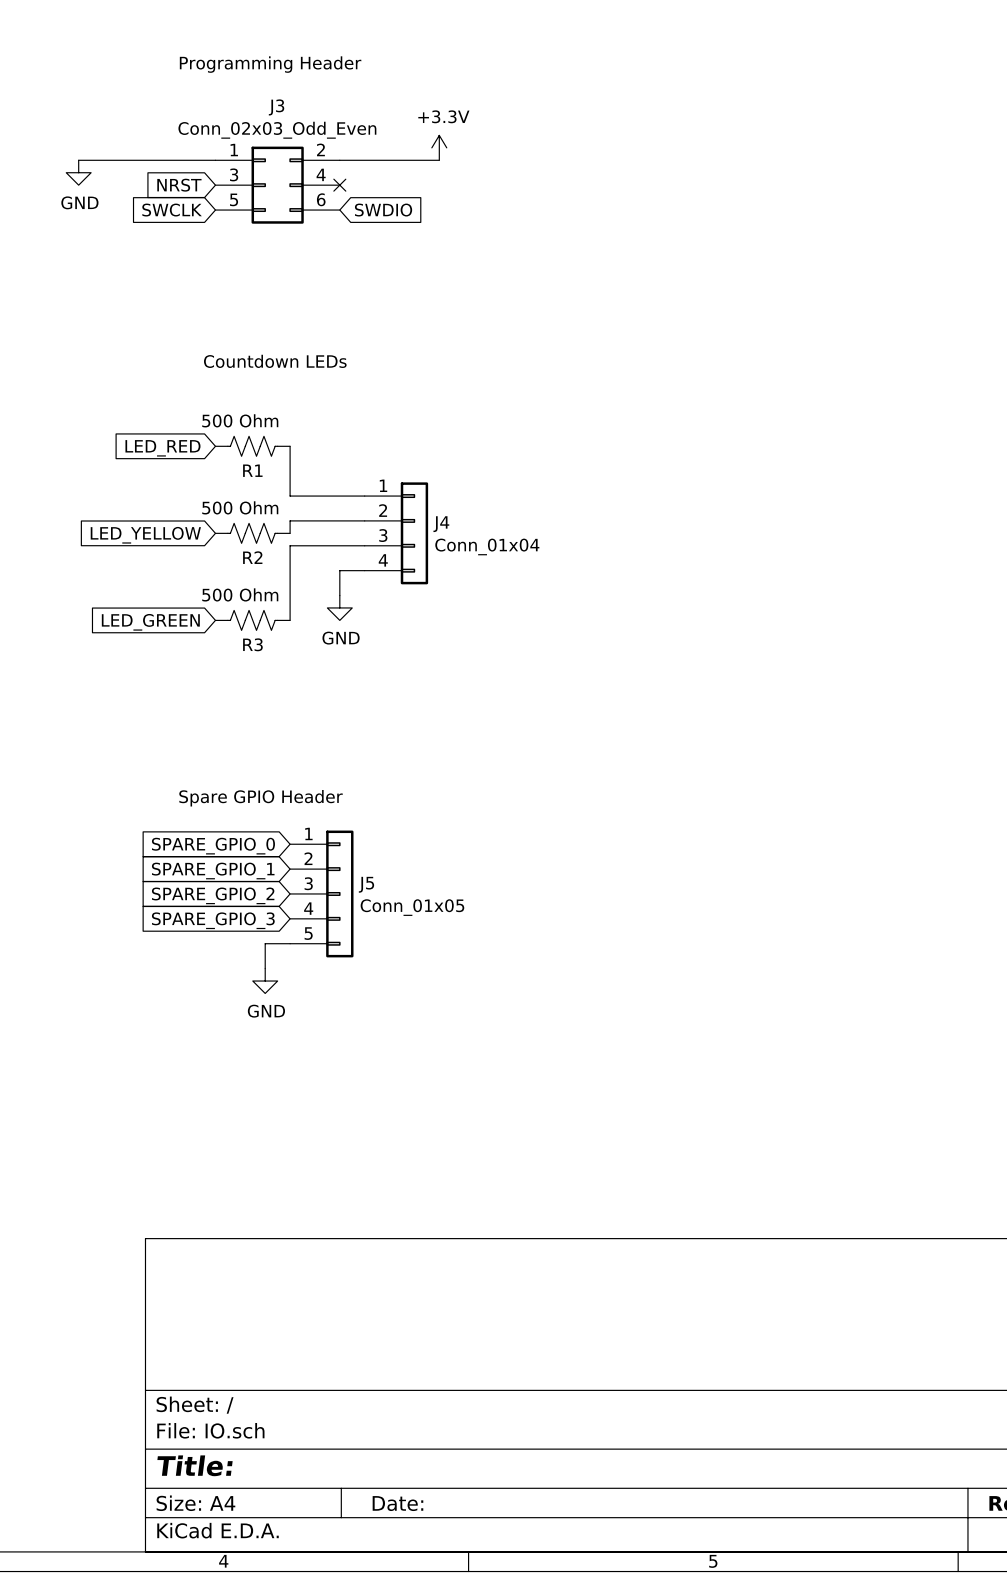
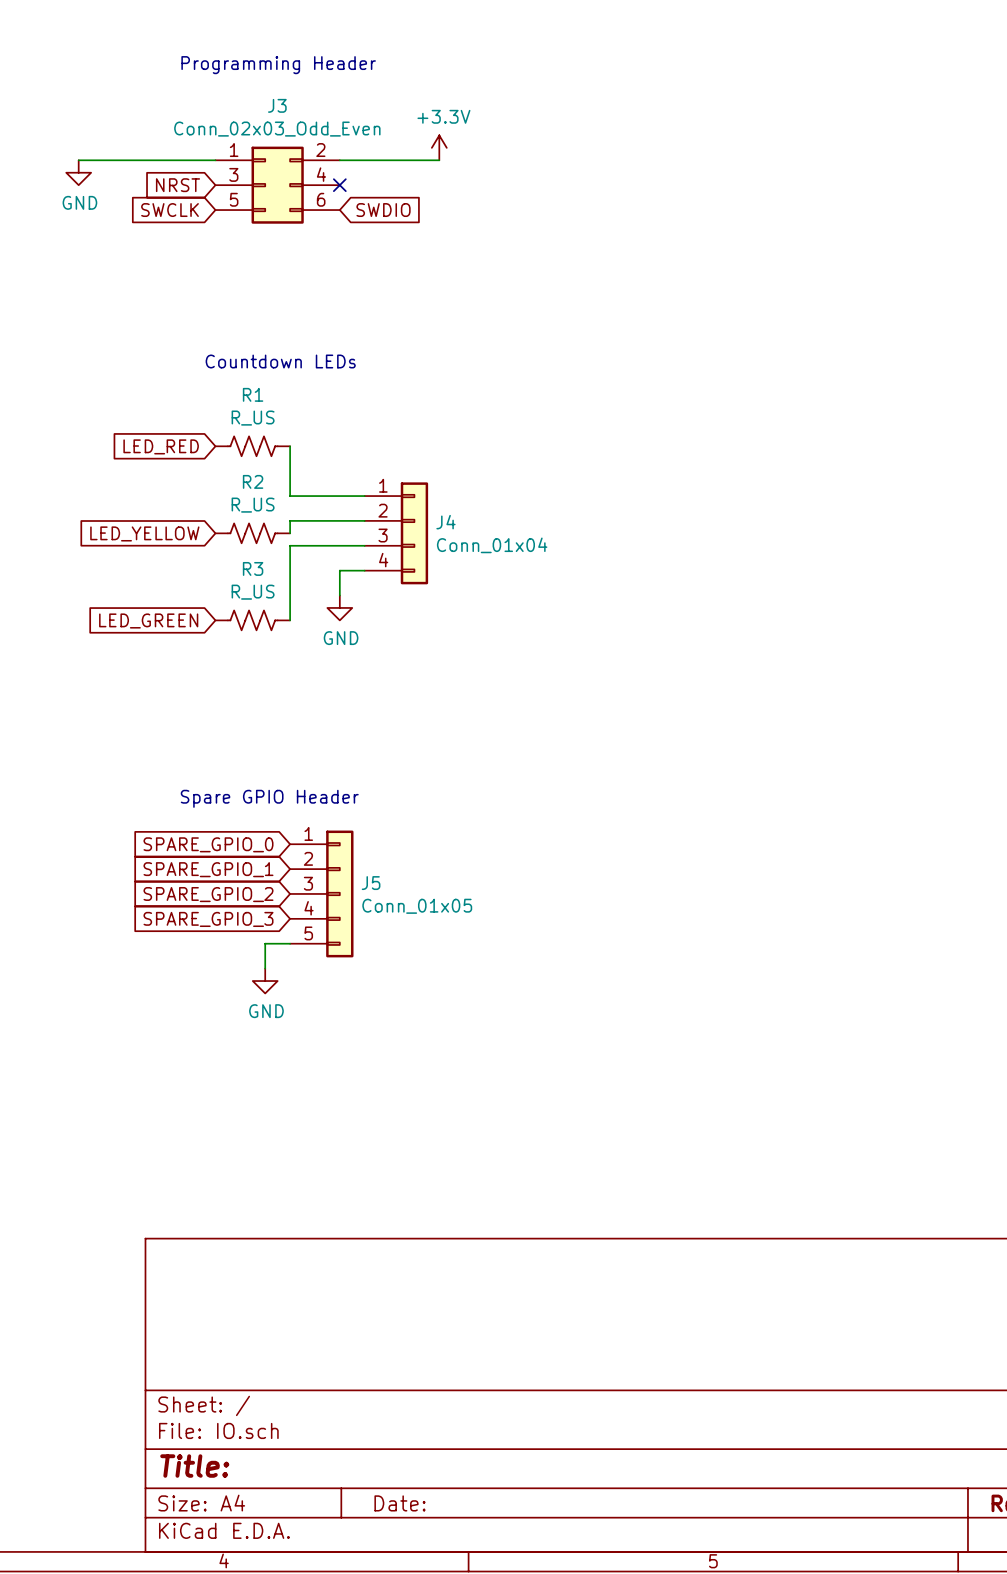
R1 value: 500 Ohm (240, 420) -> R_US (253, 418)
R1 name position: R1 (252, 470) -> R1 (253, 394)
R2 value: 500 Ohm (240, 507) -> R_US (253, 505)
R2 name position: R2 (252, 557) -> R2 (253, 481)
R3 value: 500 Ohm (240, 594) -> R_US (253, 592)
R3 name position: R3 (252, 644) -> R3 (253, 568)

